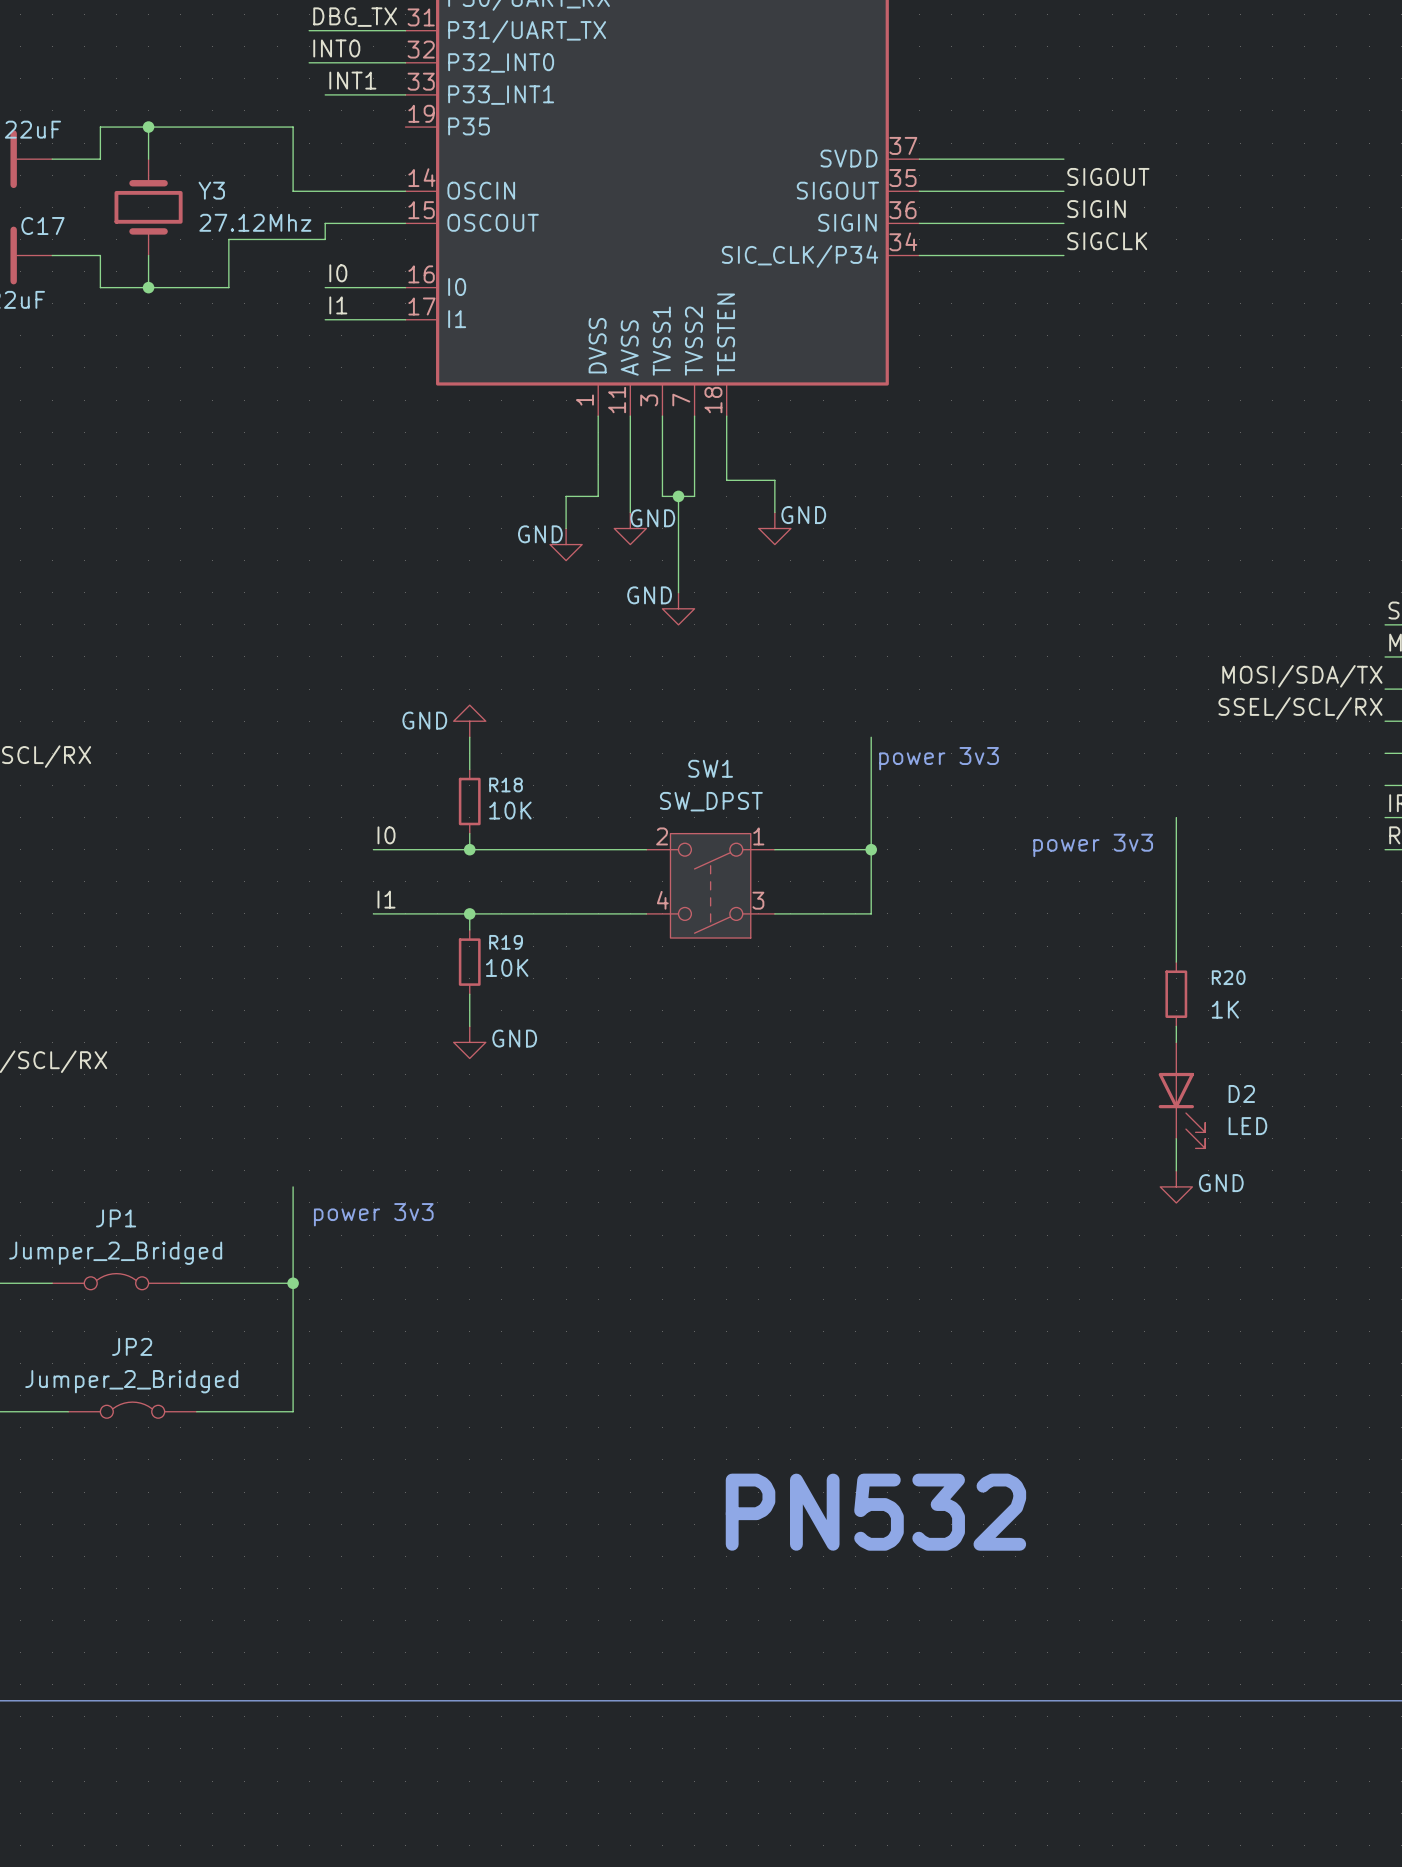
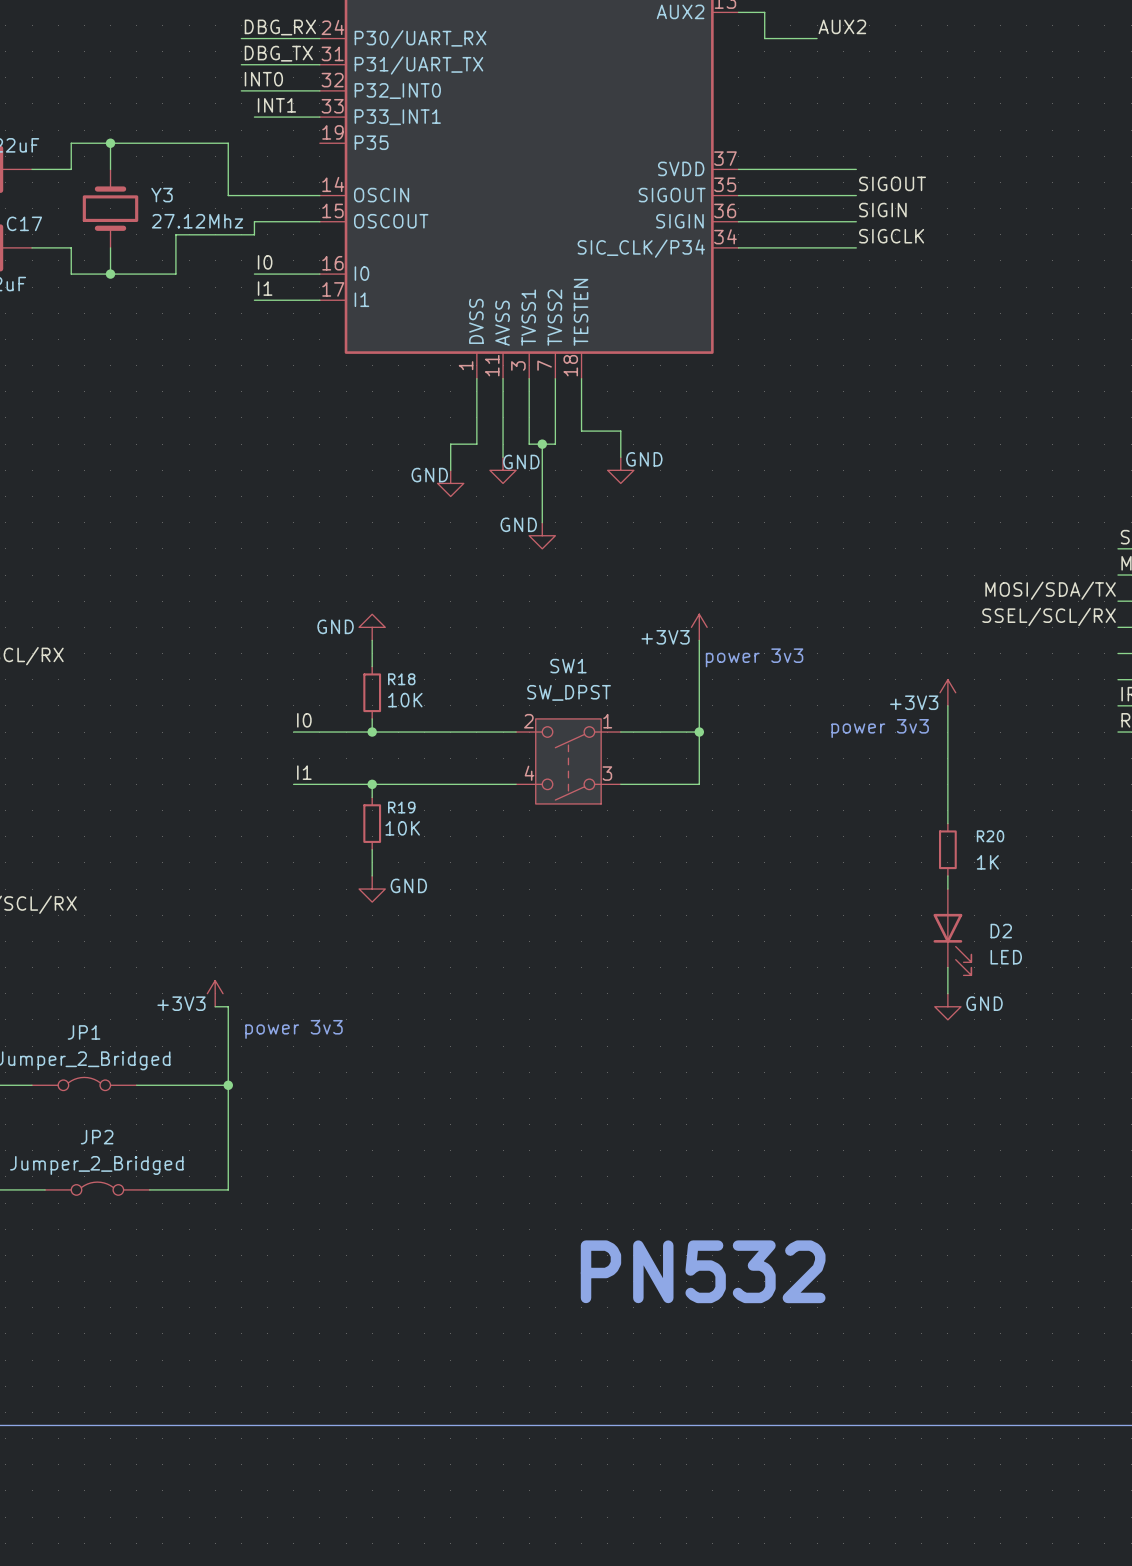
power symbol: none -> +3V3 (699, 627)
power symbol: none -> +3V3 (947, 692)
power symbol: none -> +3V3 (215, 993)
wire: none -> (215, 1006) (228, 1006)

